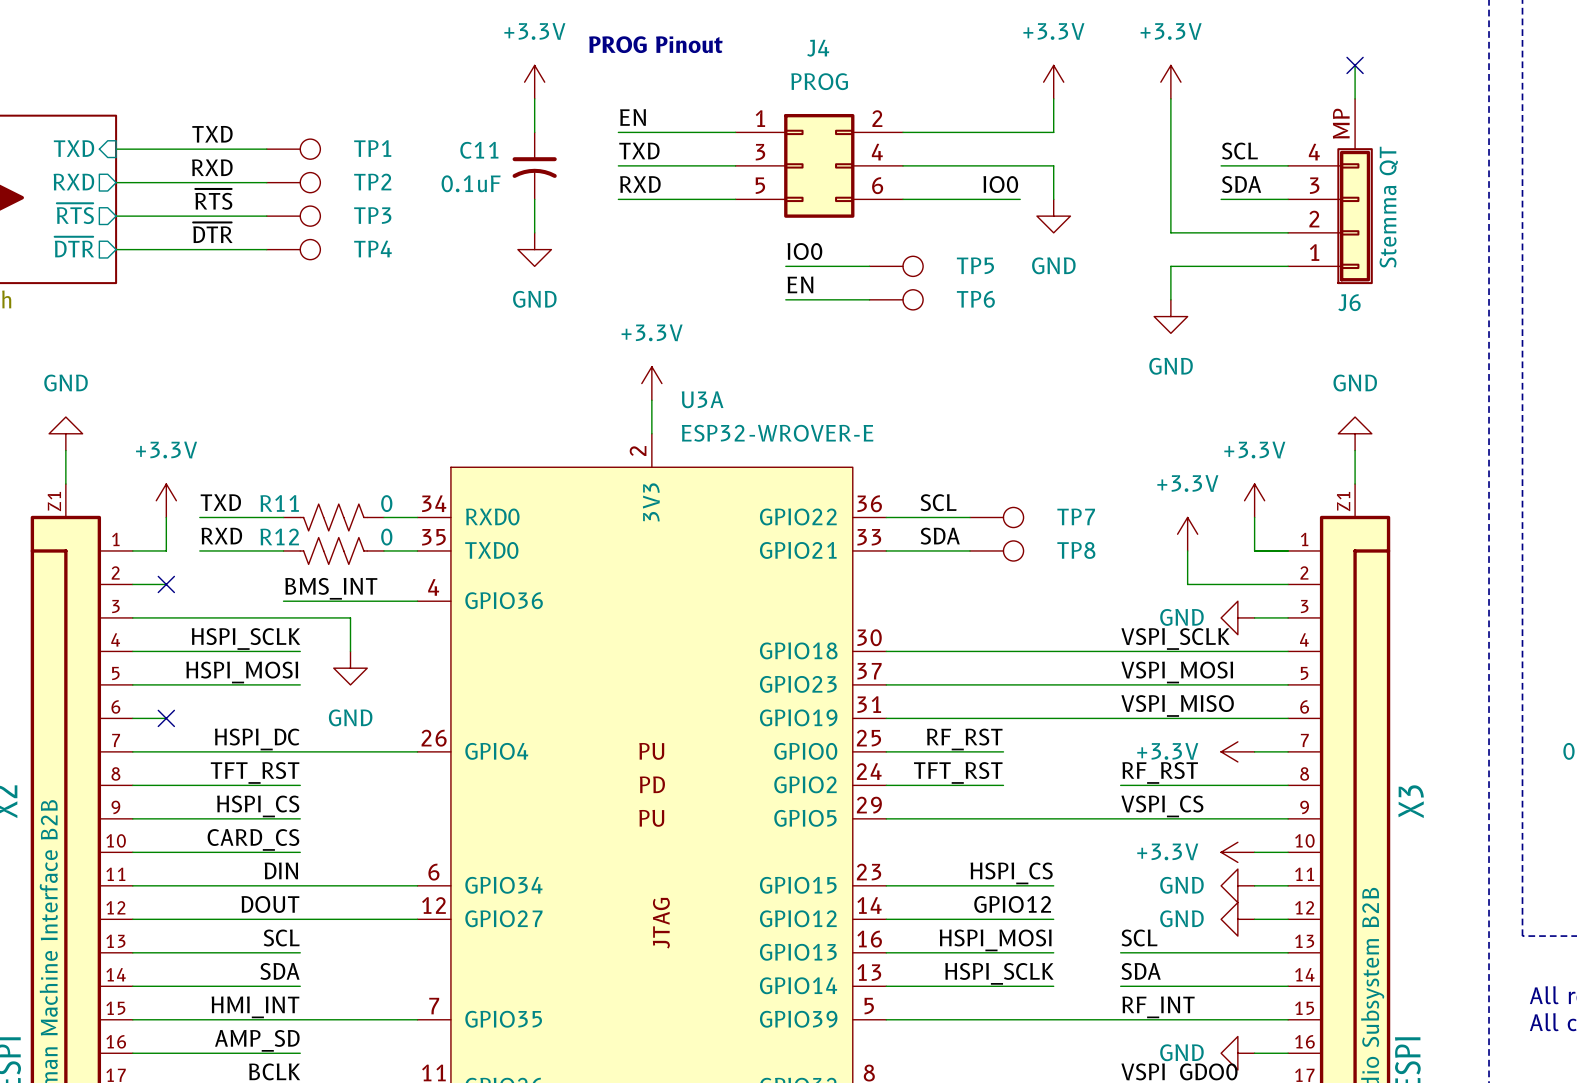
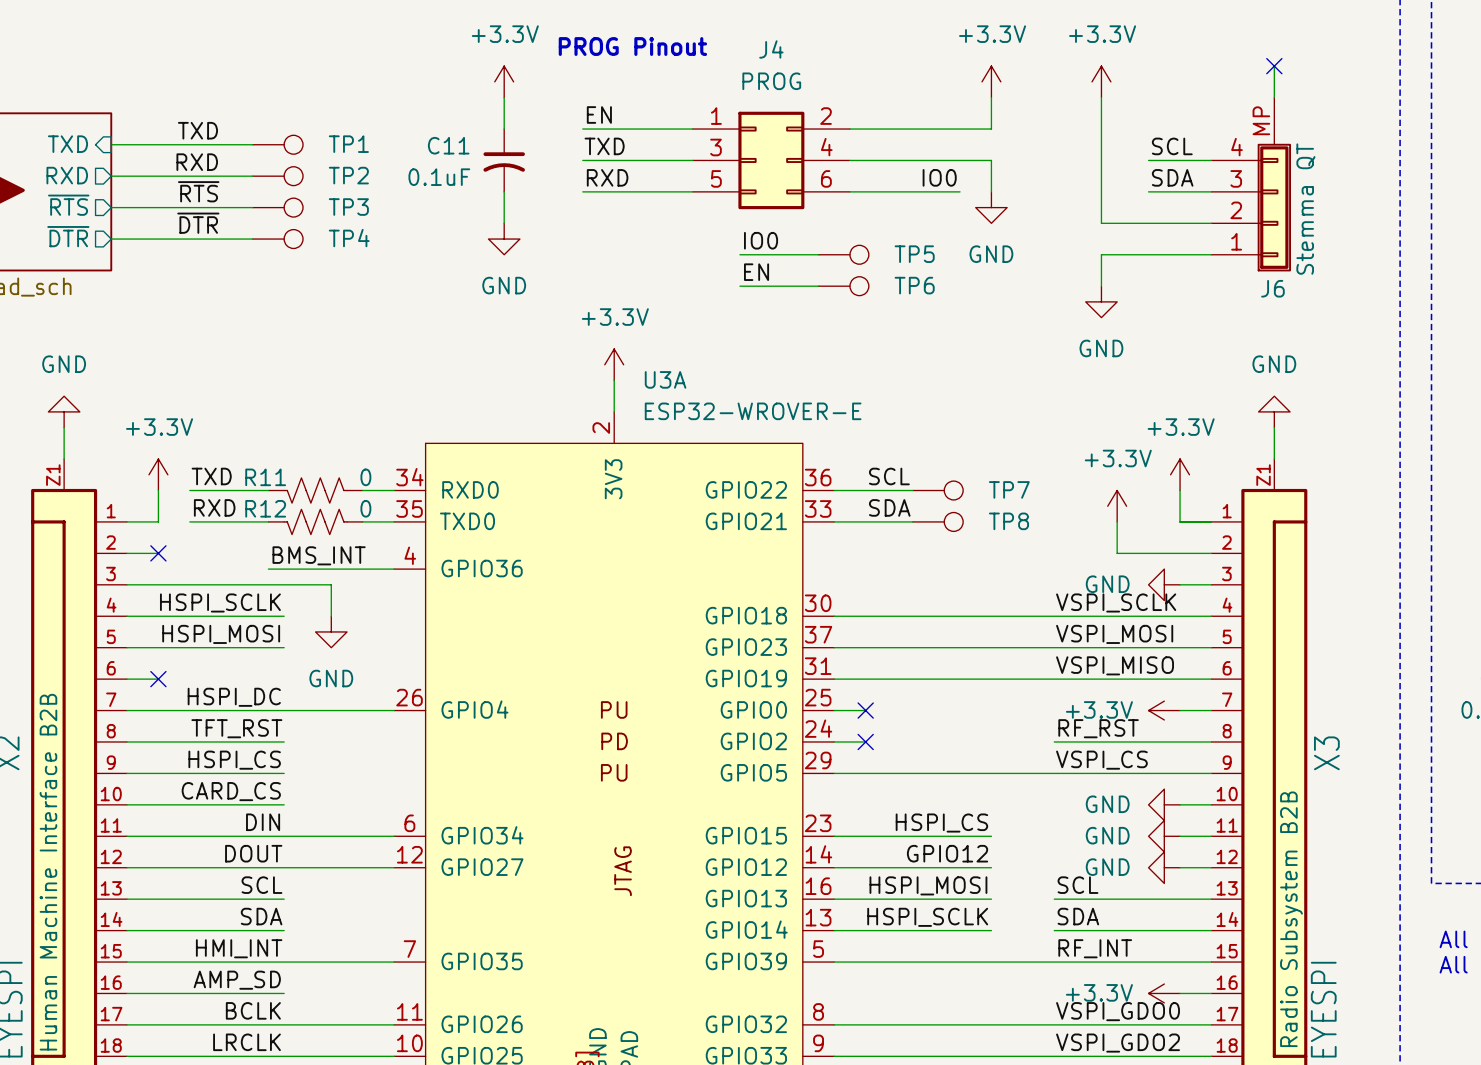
label: RF_RST (964, 739) -> none
wire: (919, 751) (1003, 751) -> none
no-connect mark: none -> (865, 710)
label: TFT_RST (958, 772) -> none
wire: (919, 785) (1003, 785) -> none
no-connect mark: none -> (865, 741)
power symbol: +3.3V (1237, 852) -> GND (1164, 804)
power symbol: GND (1237, 1053) -> +3.3V (1164, 993)

